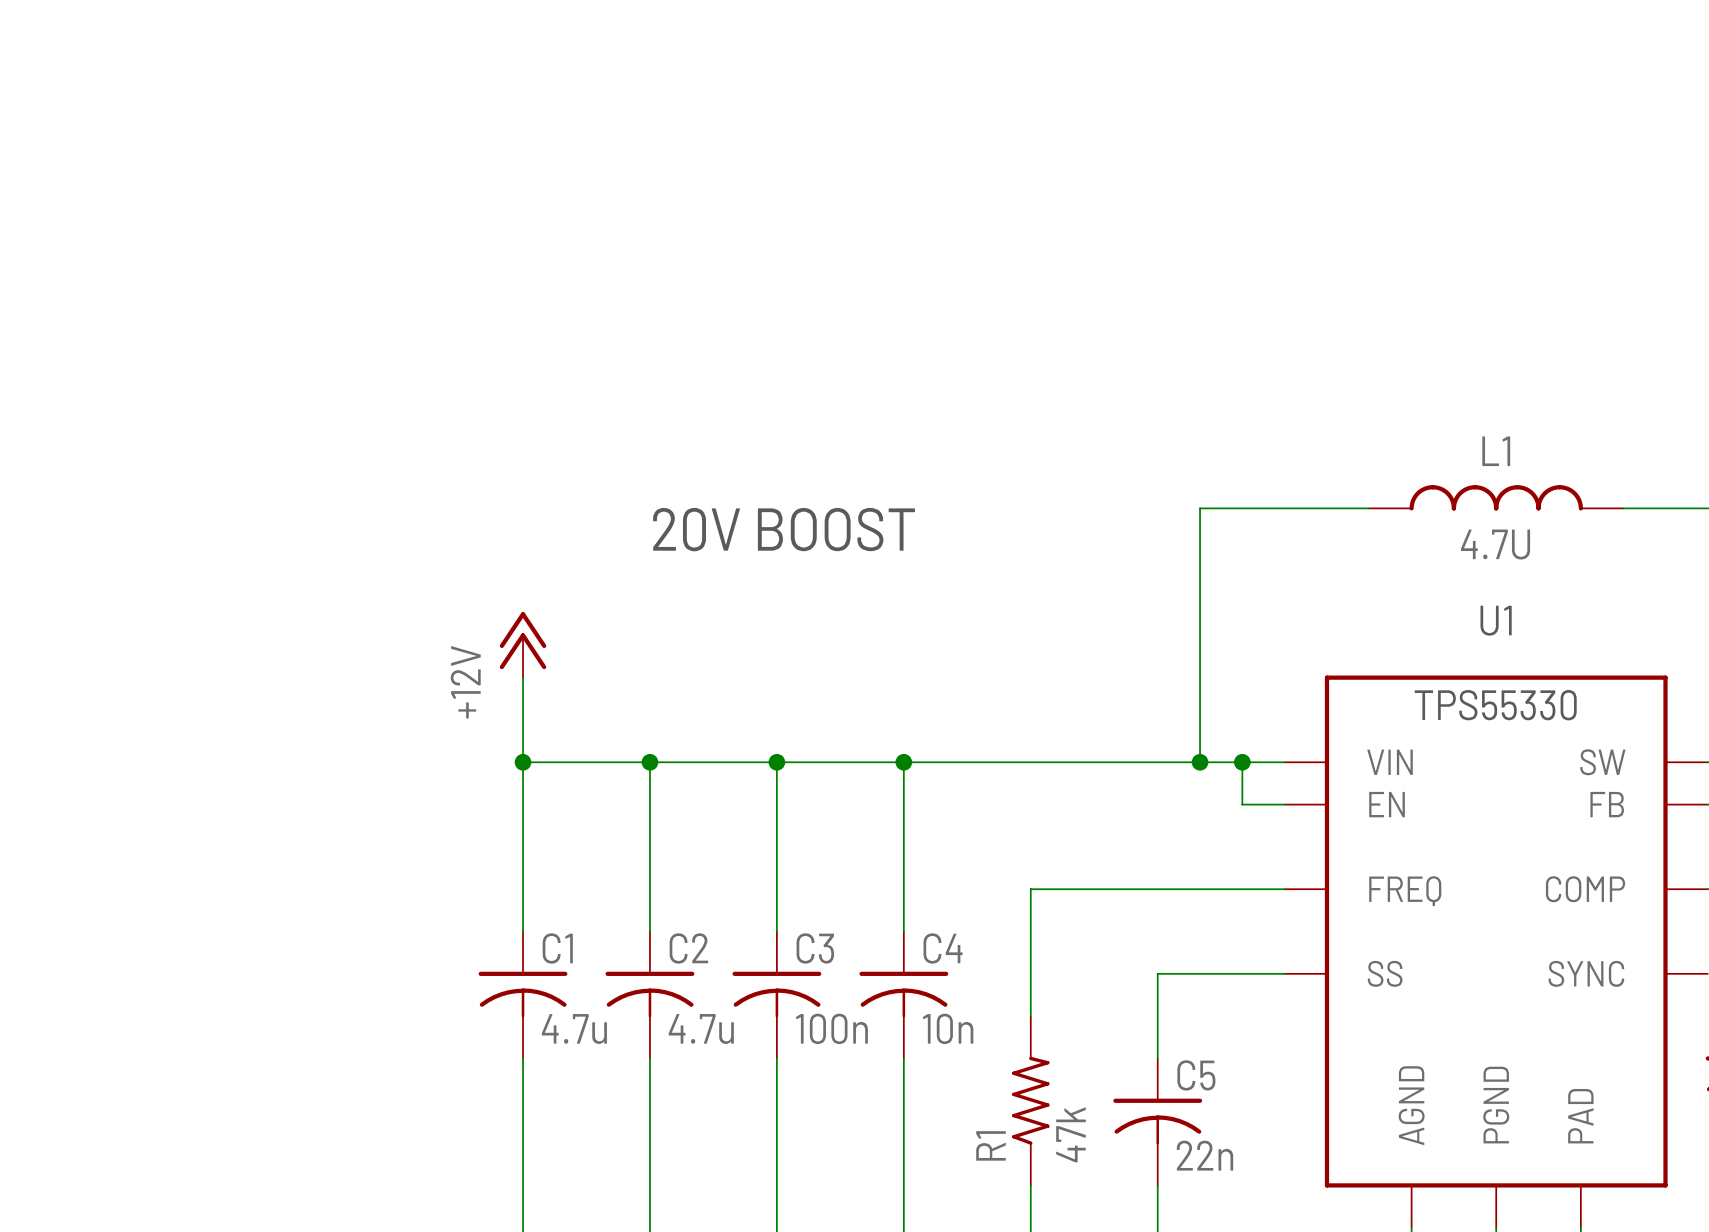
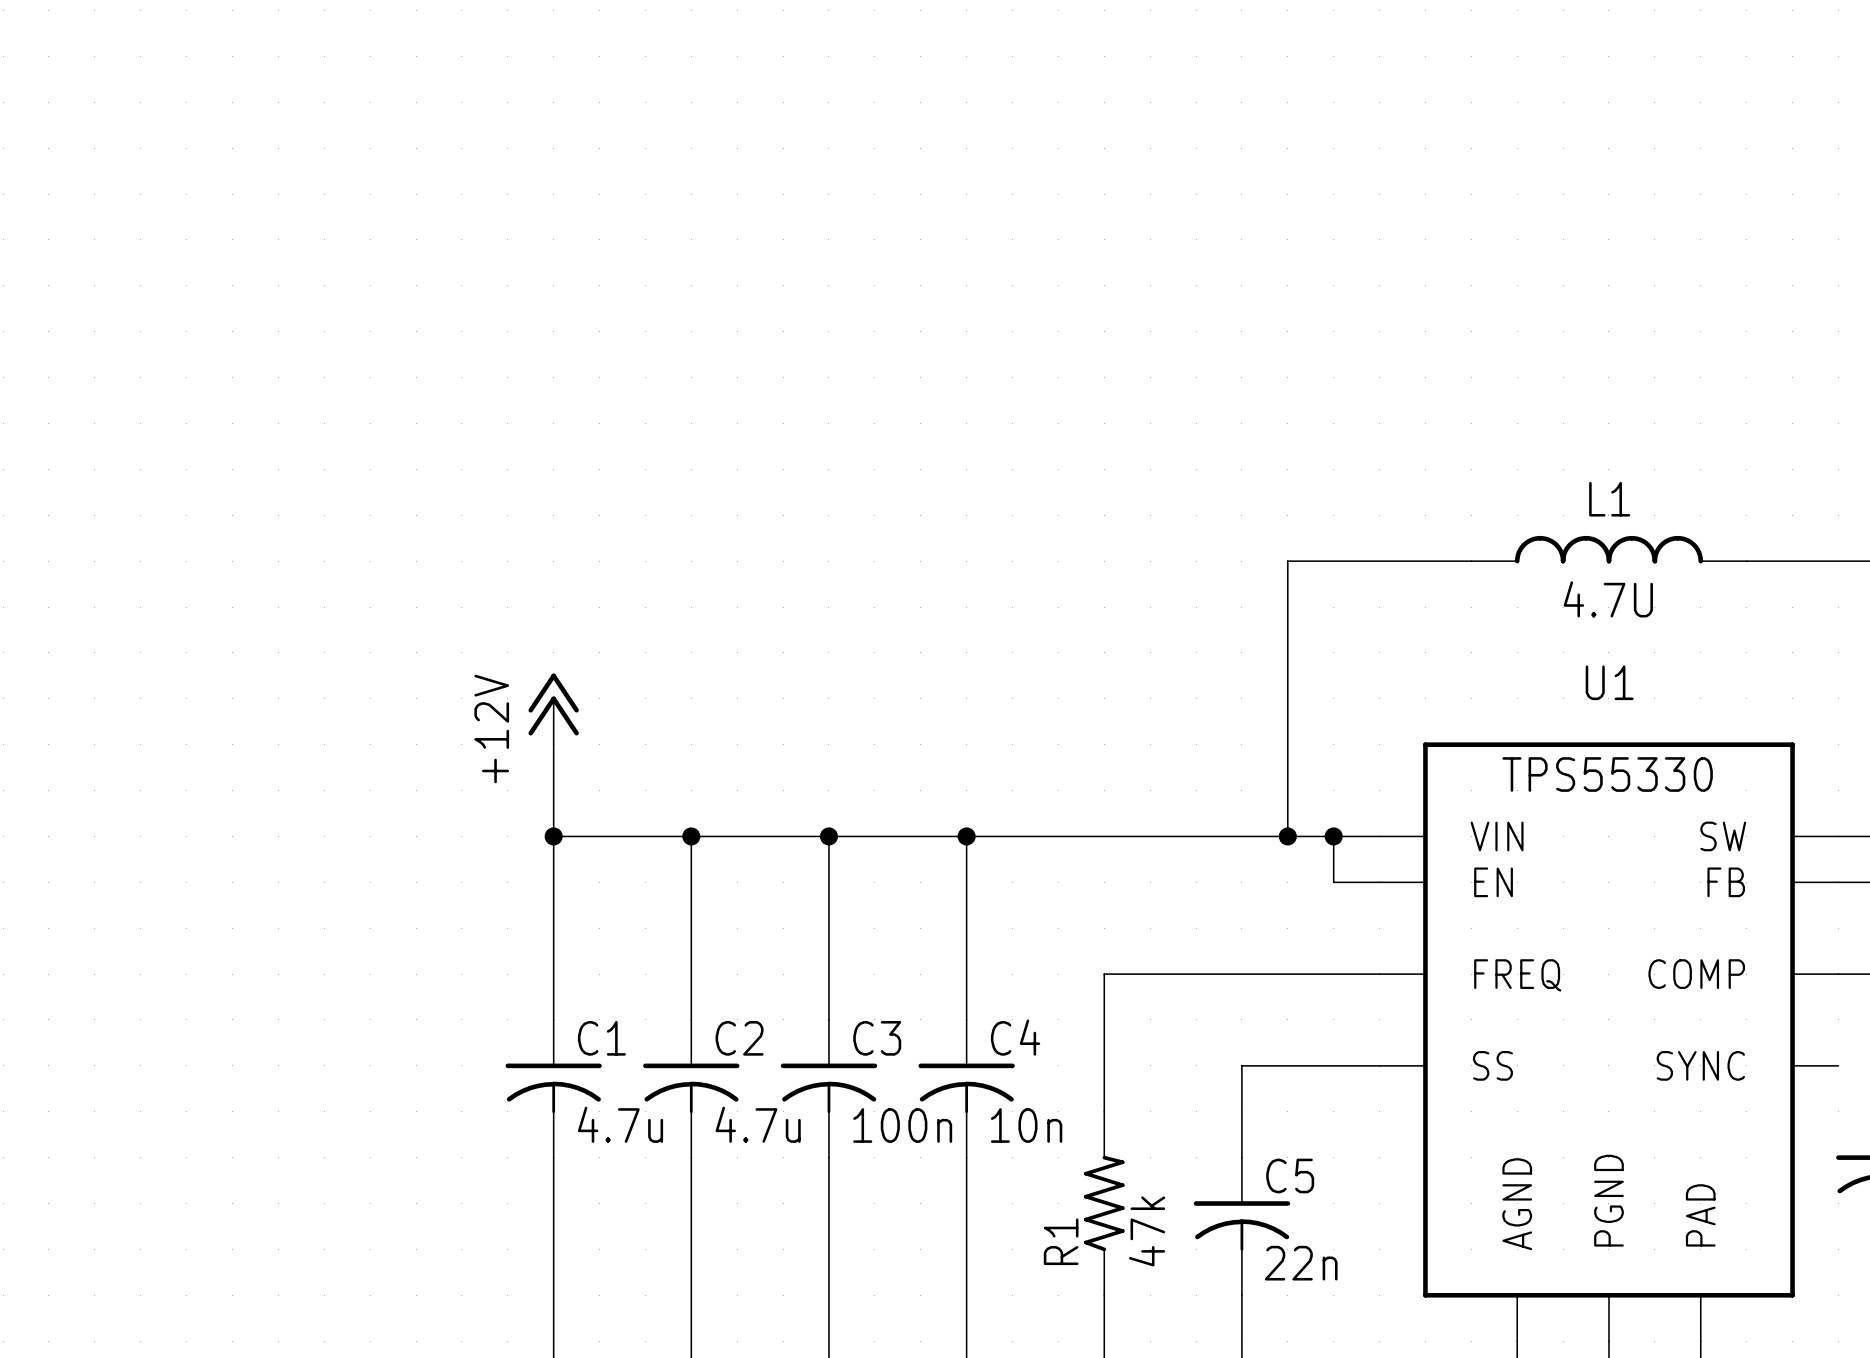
text: 20V BOOST (784, 529) -> none

